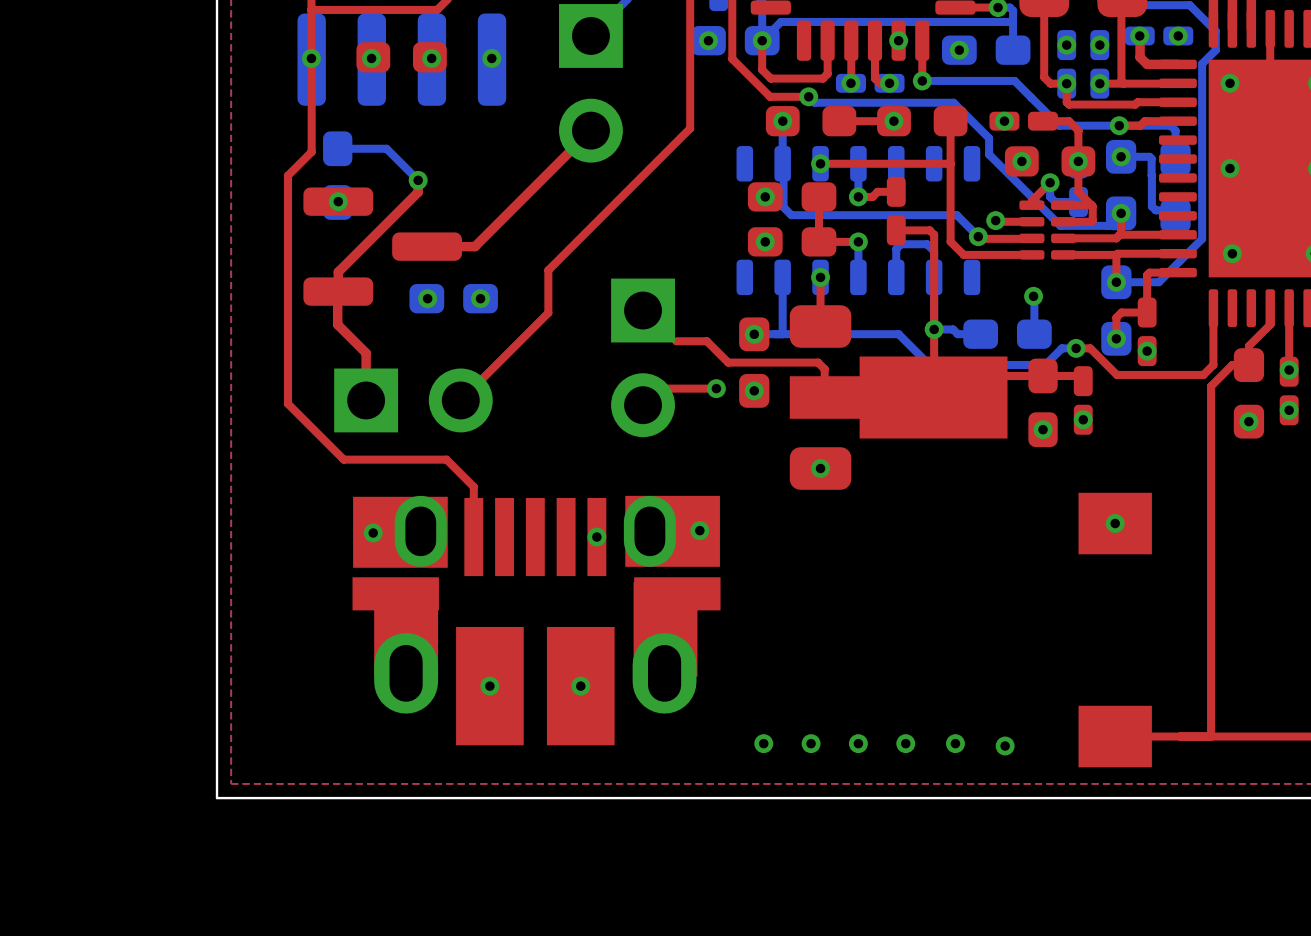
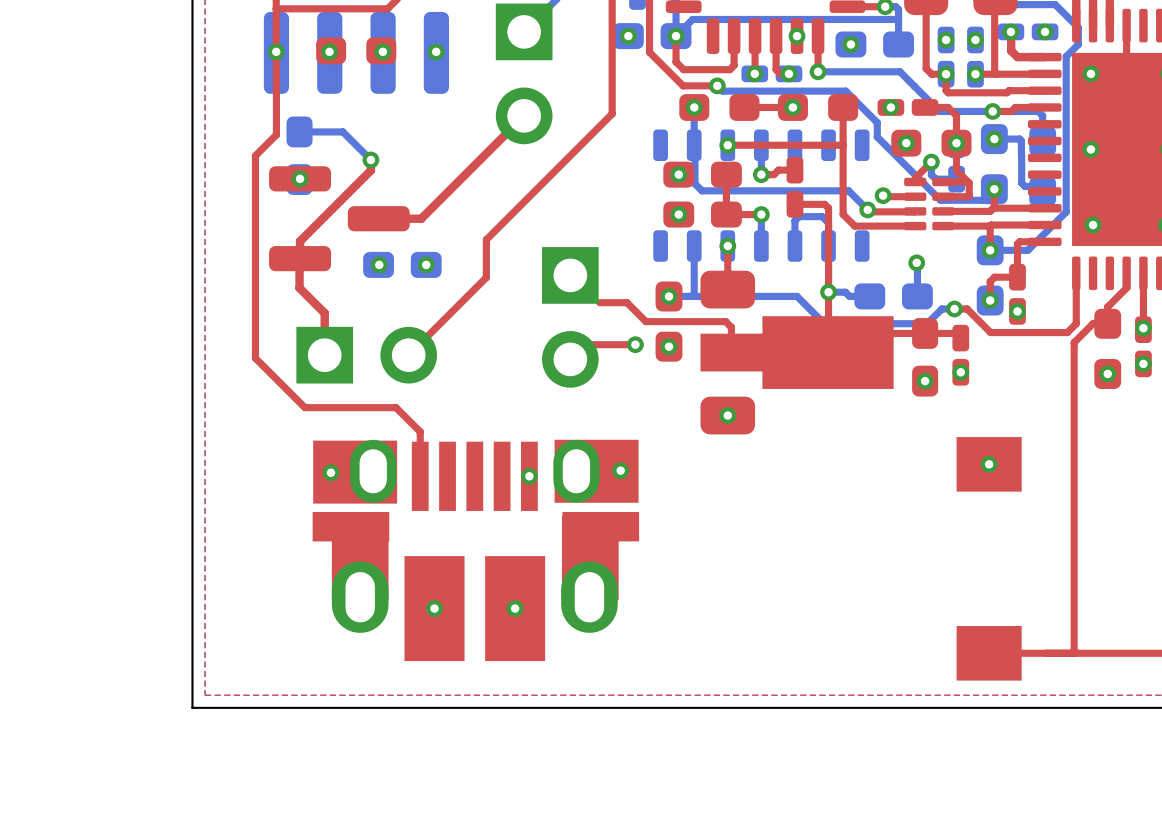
via: (763, 743) -> none
via: (811, 743) -> none
via: (858, 743) -> none
via: (905, 743) -> none
via: (955, 743) -> none
via: (1005, 746) -> none

